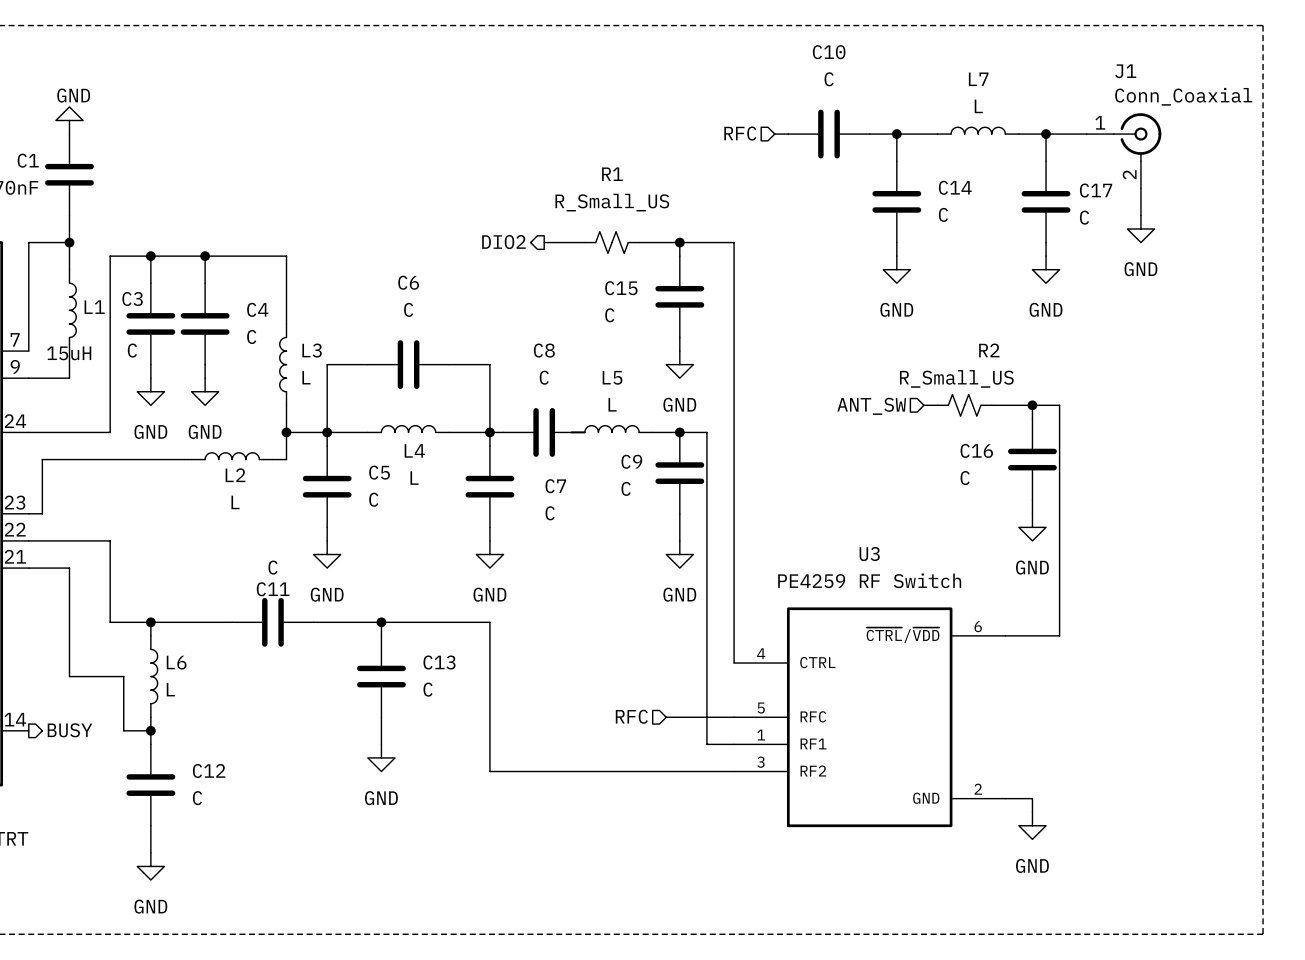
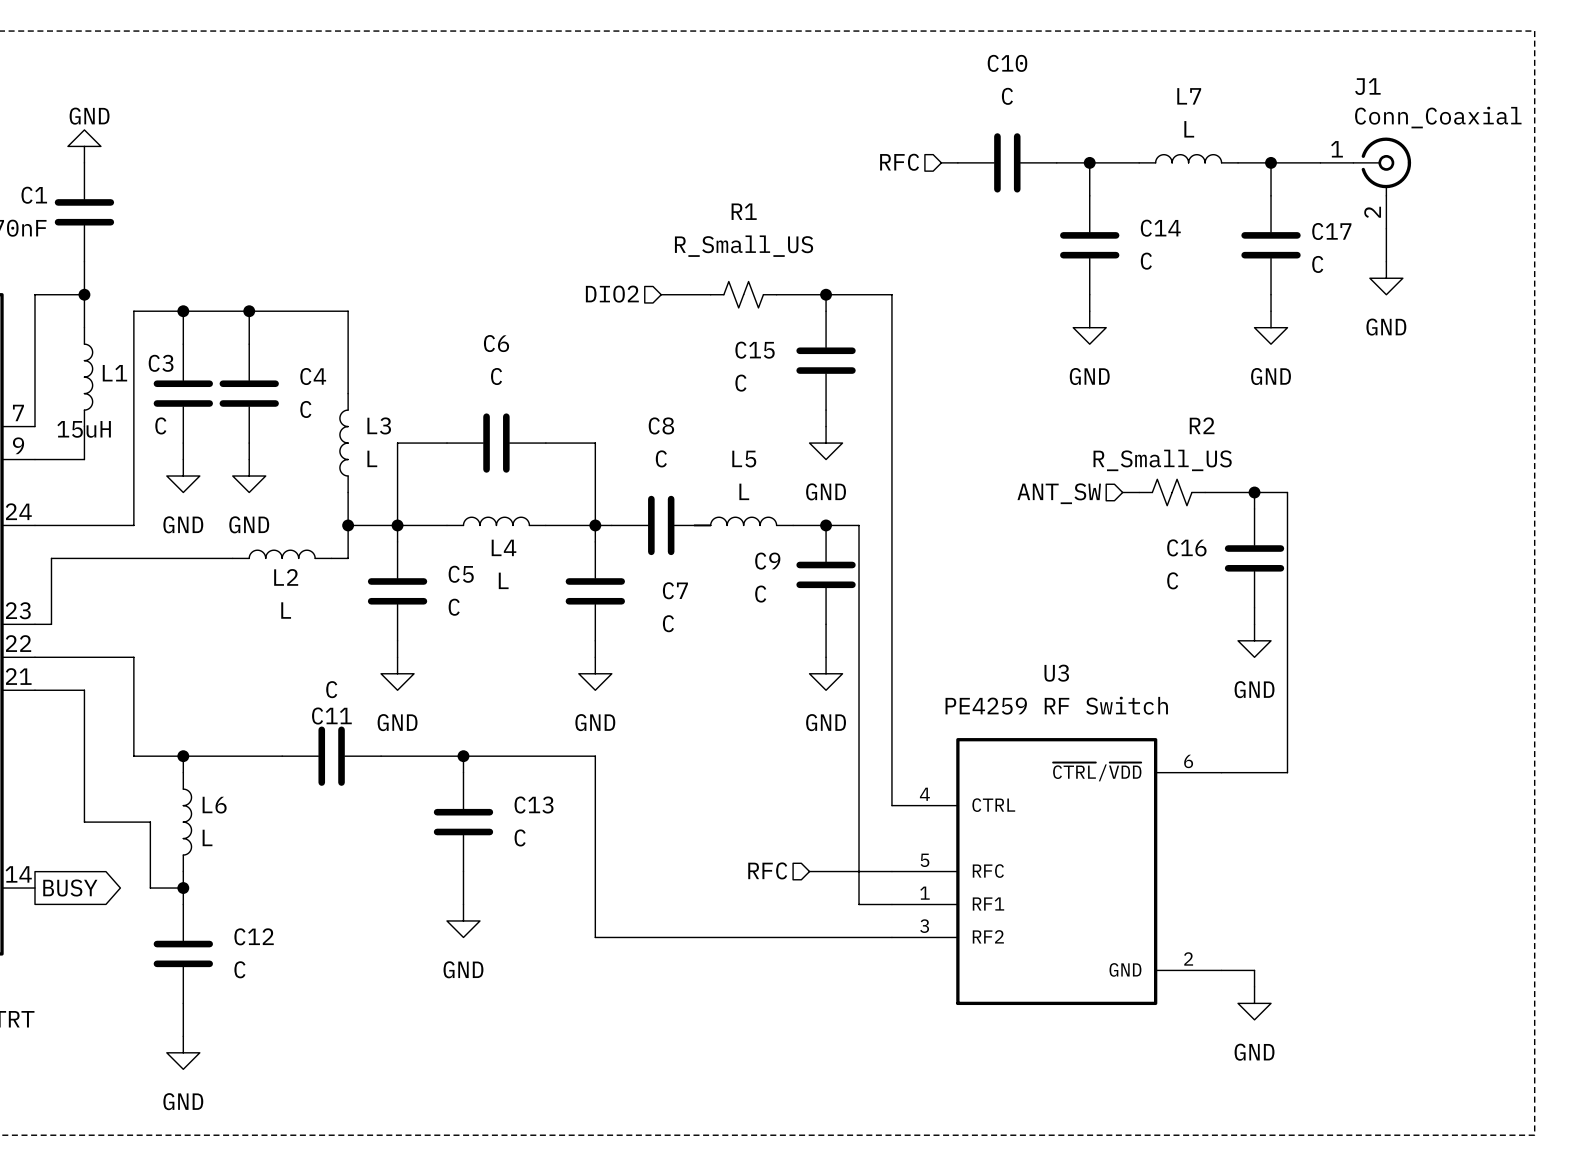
hierarchical label shape: output (503, 242) -> input (612, 294)
global label: none -> BUSY (70, 888)
hierarchical label: BUSY (70, 730) -> none

